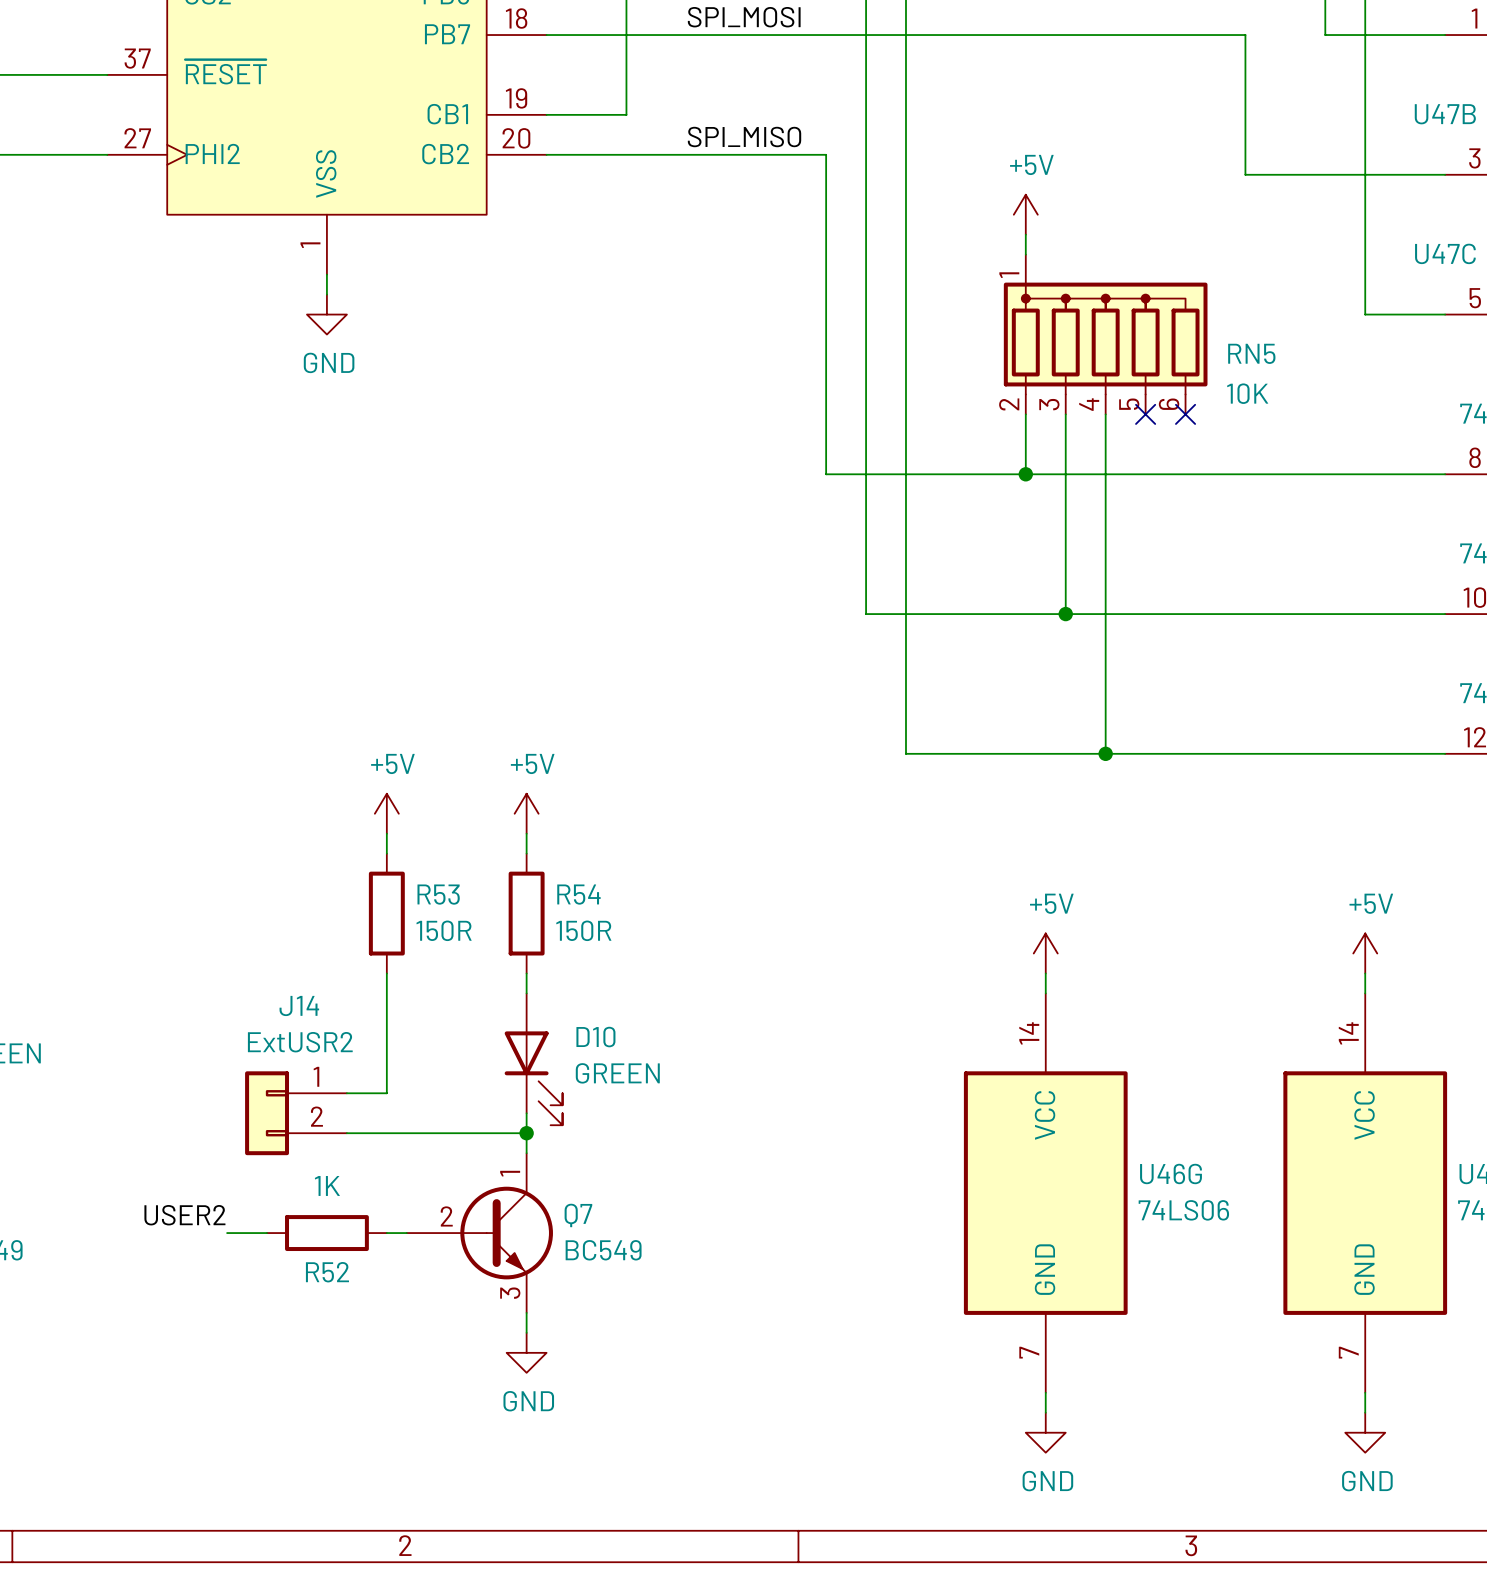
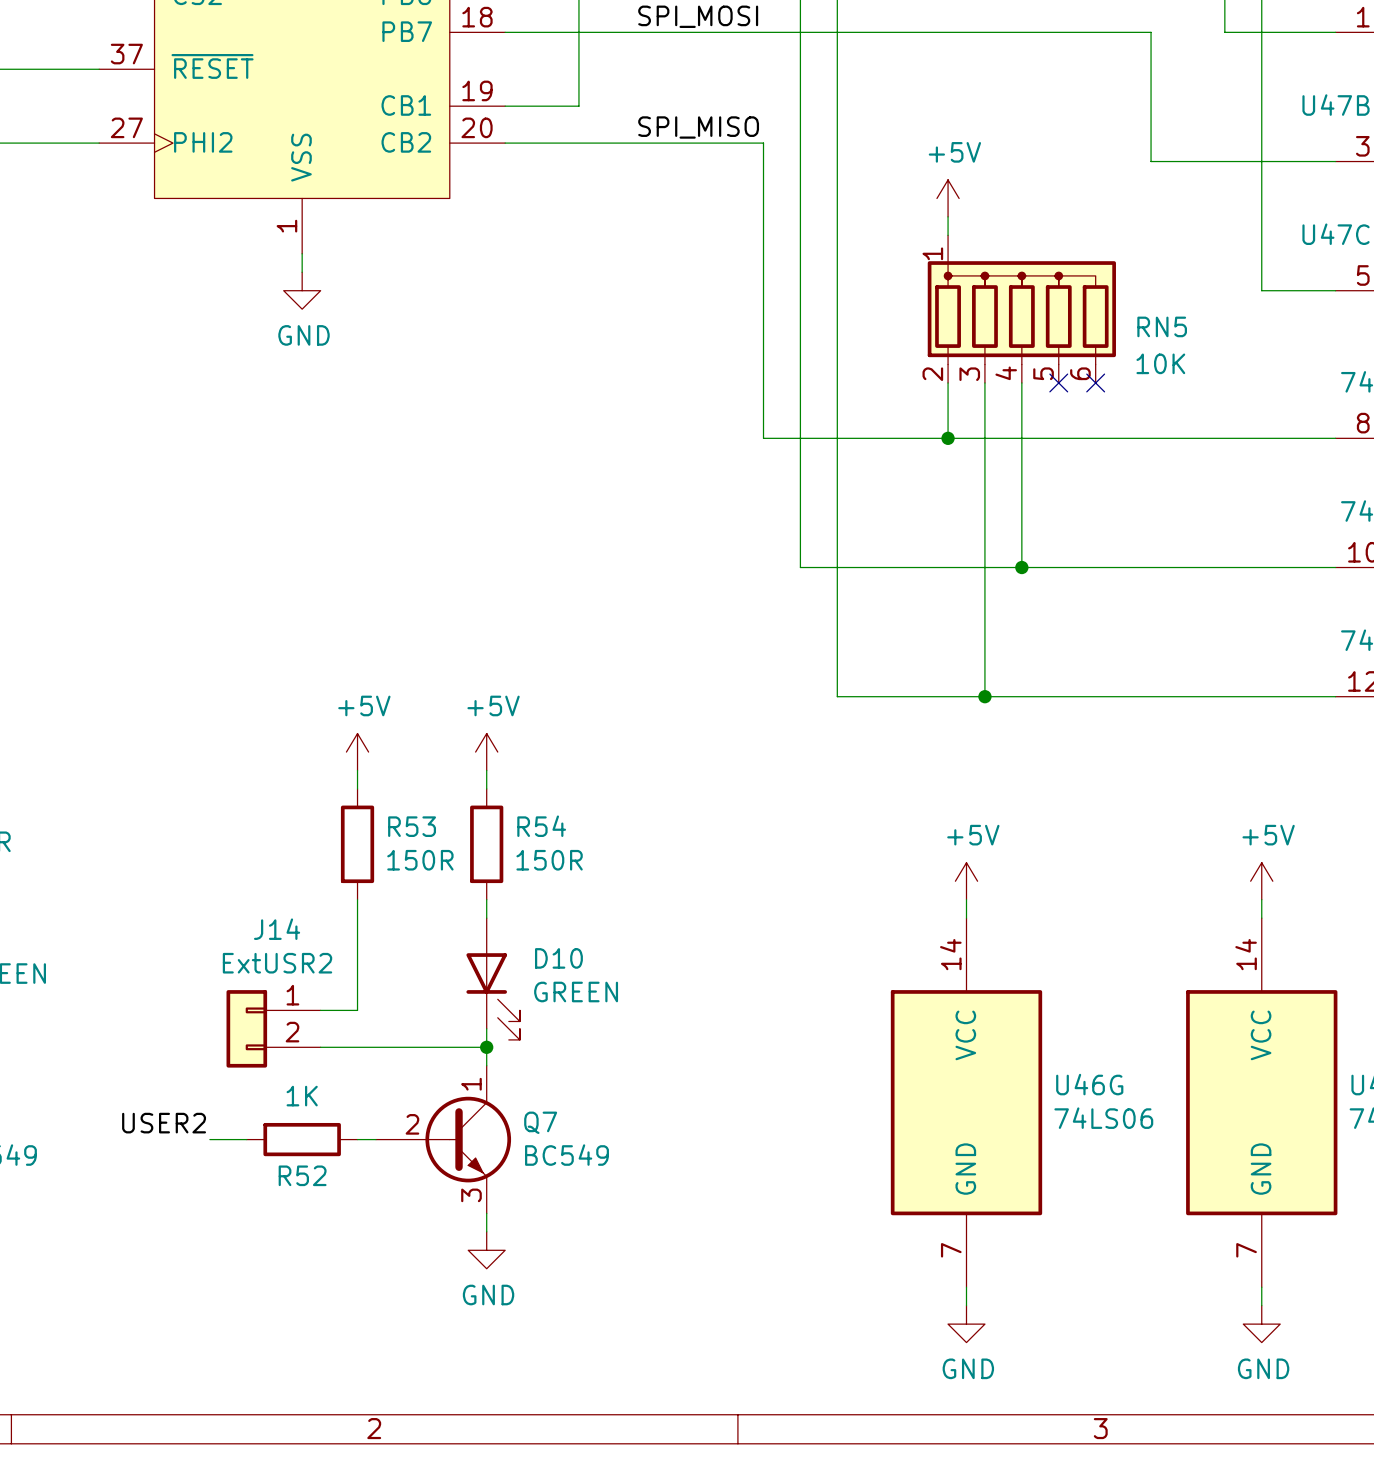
junction position: (1065, 614) -> (1021, 567)
wire: (1105, 614) (1105, 753) -> (984, 567) (984, 696)
junction position: (1105, 753) -> (984, 696)

